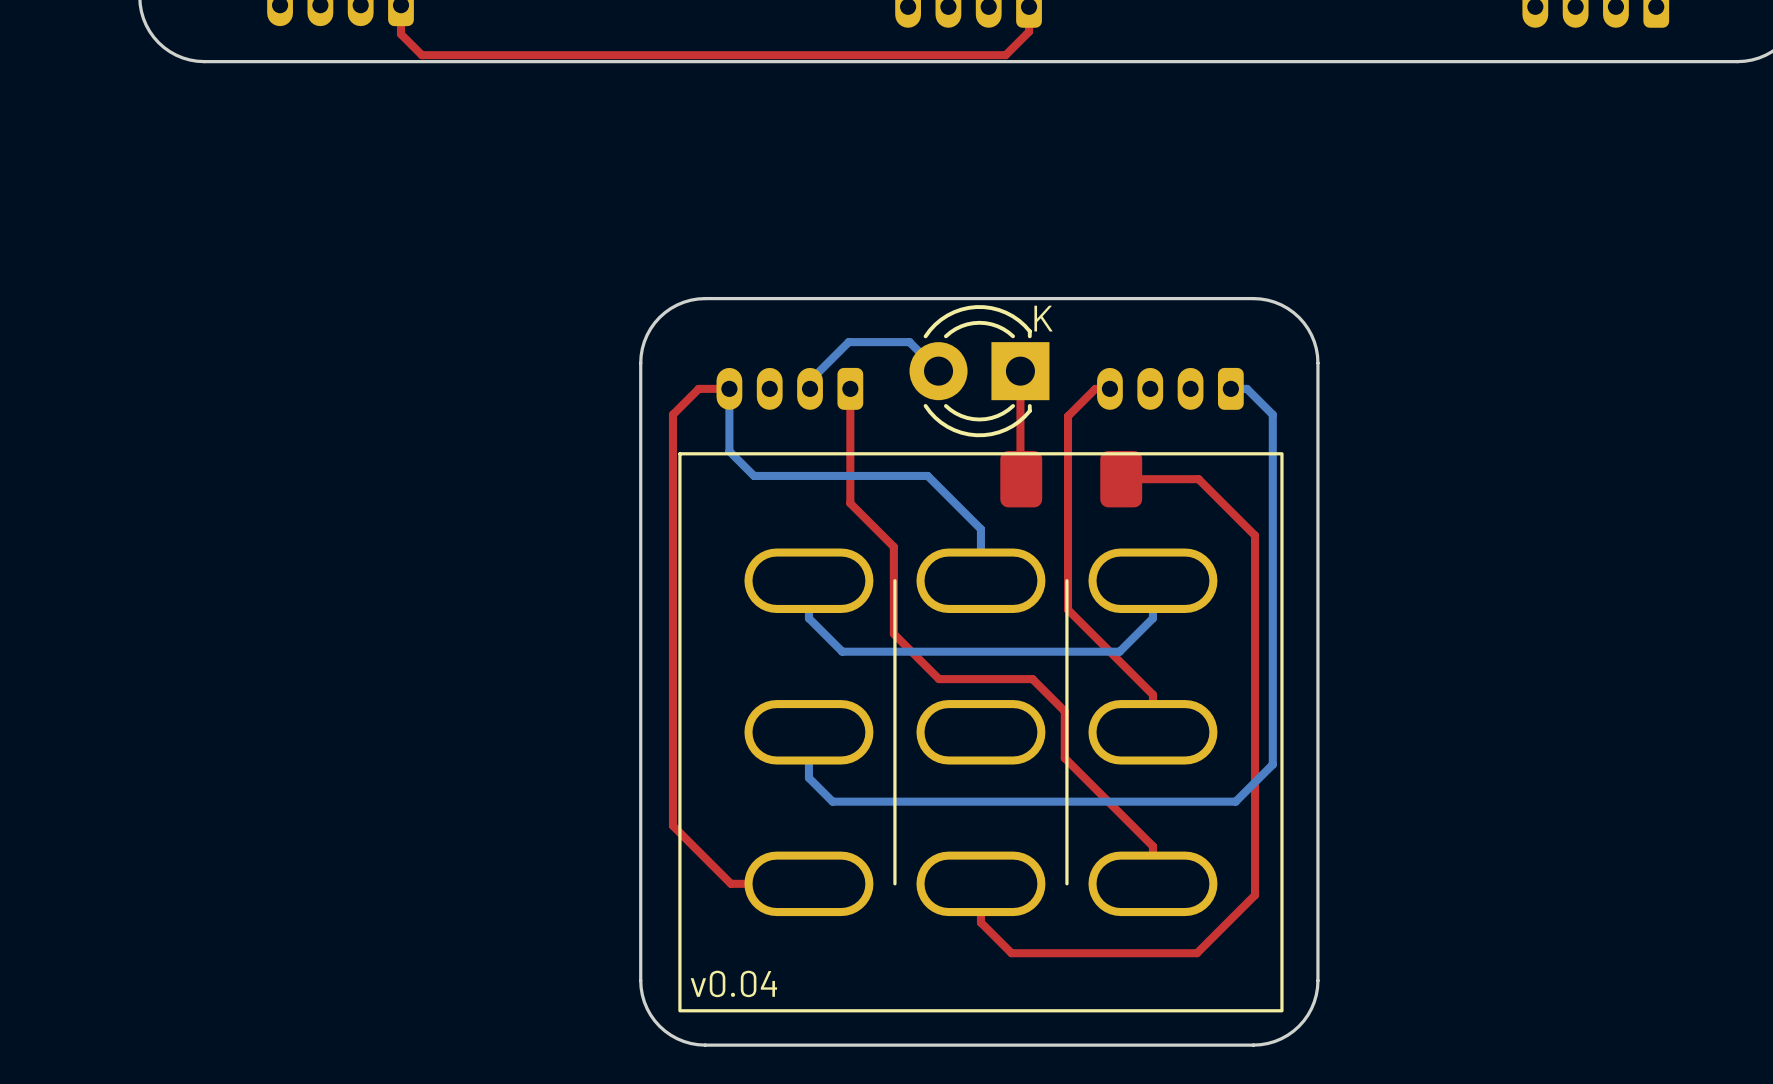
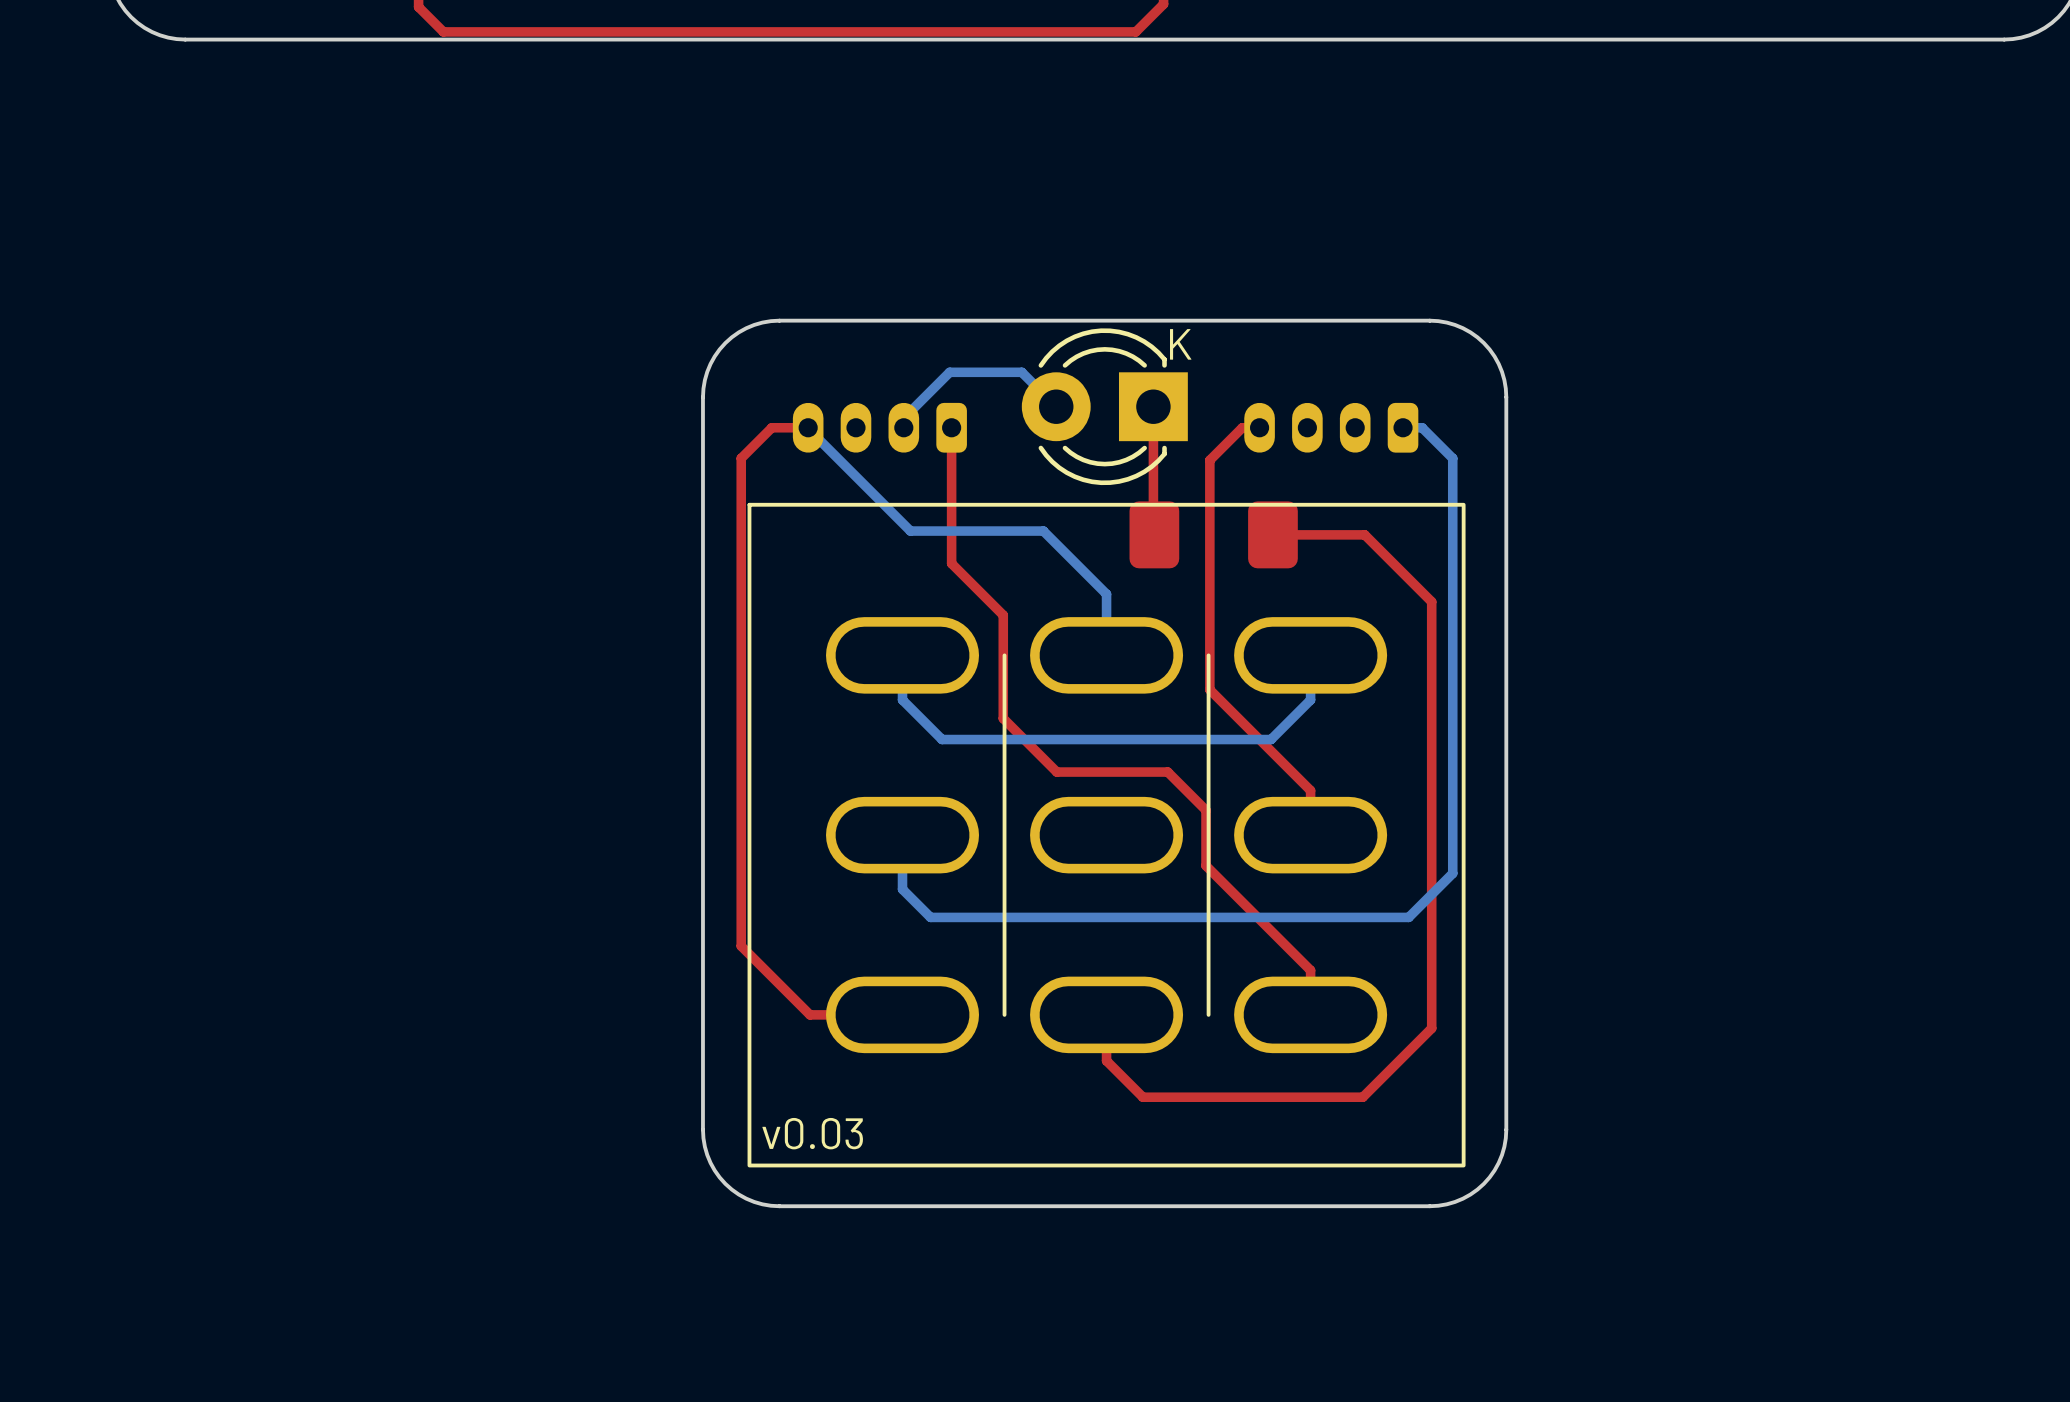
bottom track: (729, 389) (729, 451) (754, 475) (815, 475) -> (808, 428) (910, 531)
text: v0.04 (733, 983) -> v0.03 (812, 1133)

